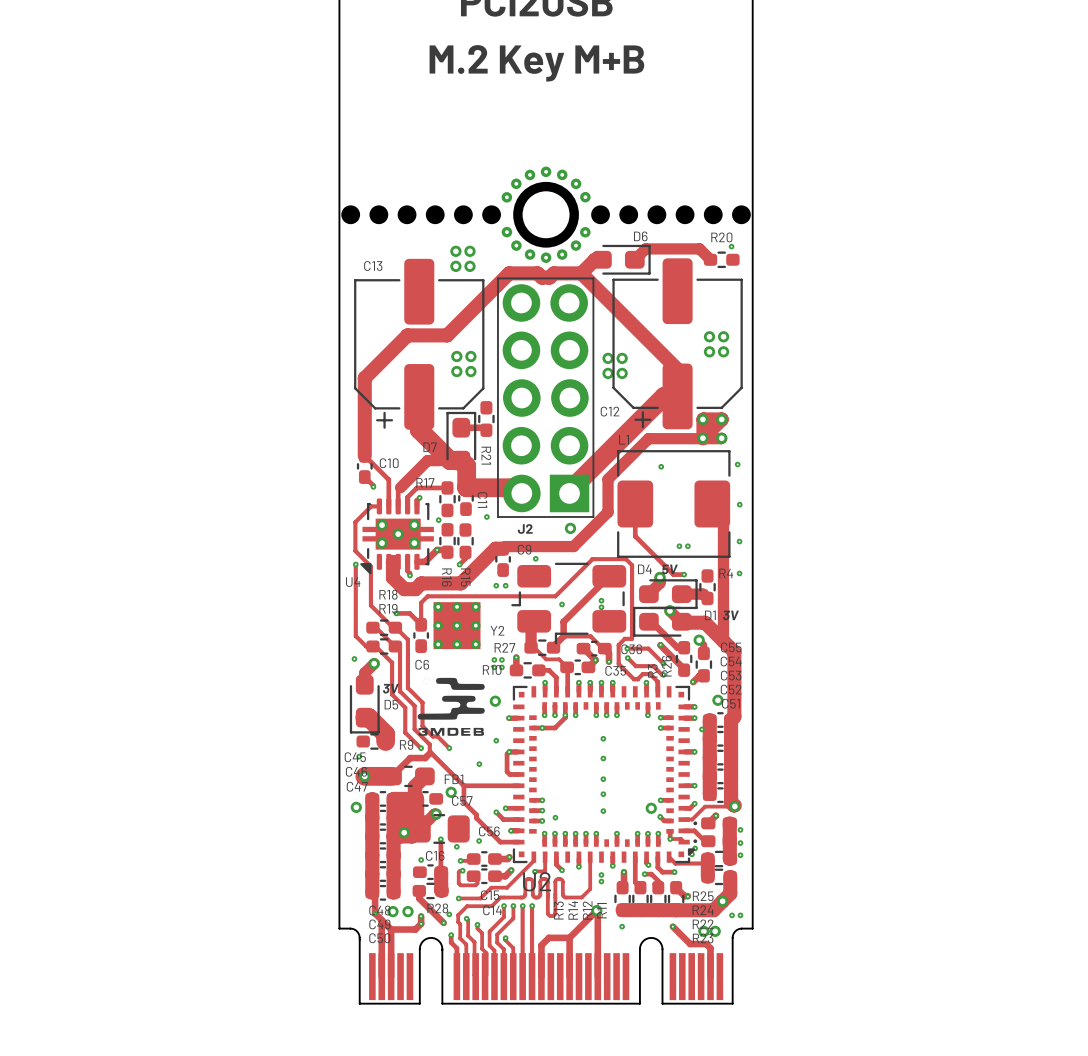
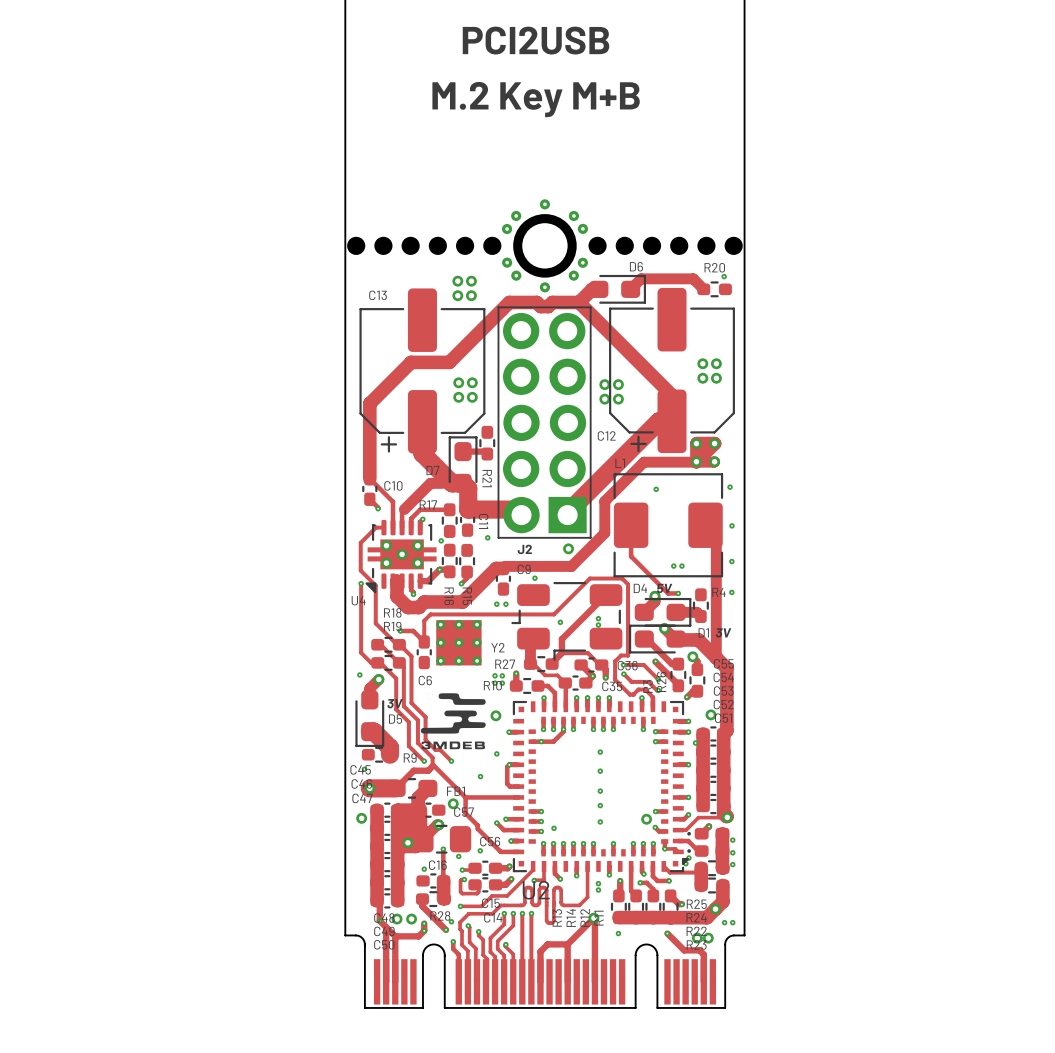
via: (529, 174) -> none
via: (562, 174) -> none
via: (530, 254) -> none
via: (562, 254) -> none

